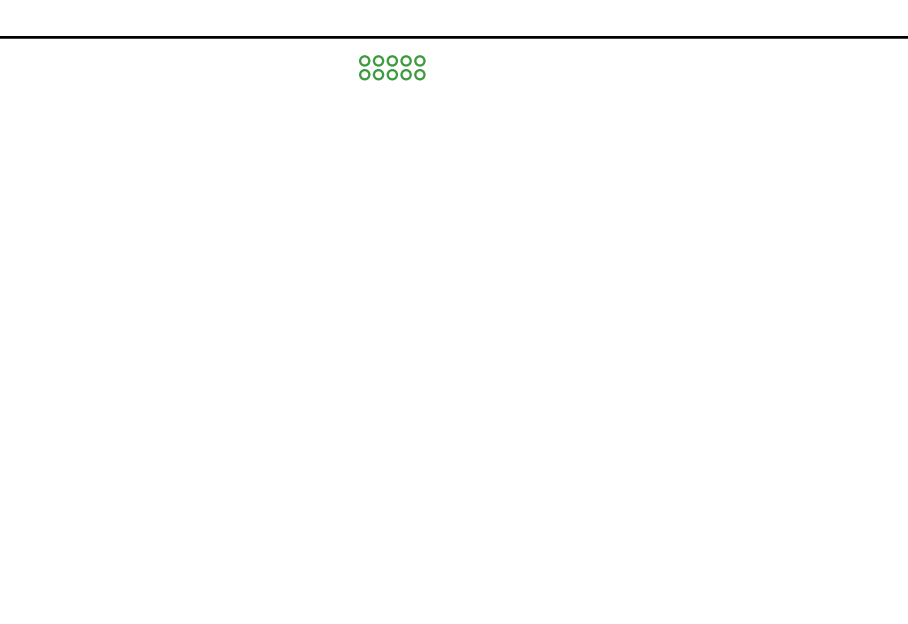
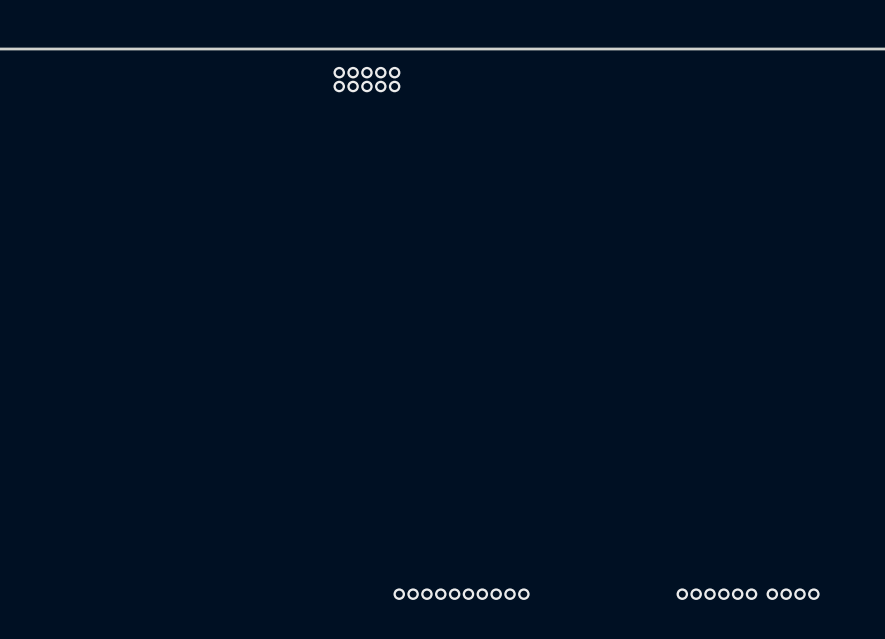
via: none -> (399, 594)
via: none -> (413, 594)
via: none -> (426, 594)
via: none -> (440, 594)
via: none -> (454, 594)
via: none -> (468, 594)
via: none -> (482, 594)
via: none -> (496, 594)
via: none -> (510, 594)
via: none -> (523, 594)
via: none -> (682, 594)
via: none -> (696, 594)
via: none -> (709, 594)
via: none -> (723, 594)
via: none -> (737, 594)
via: none -> (751, 594)
via: none -> (772, 594)
via: none -> (786, 594)
via: none -> (799, 594)
via: none -> (813, 594)

